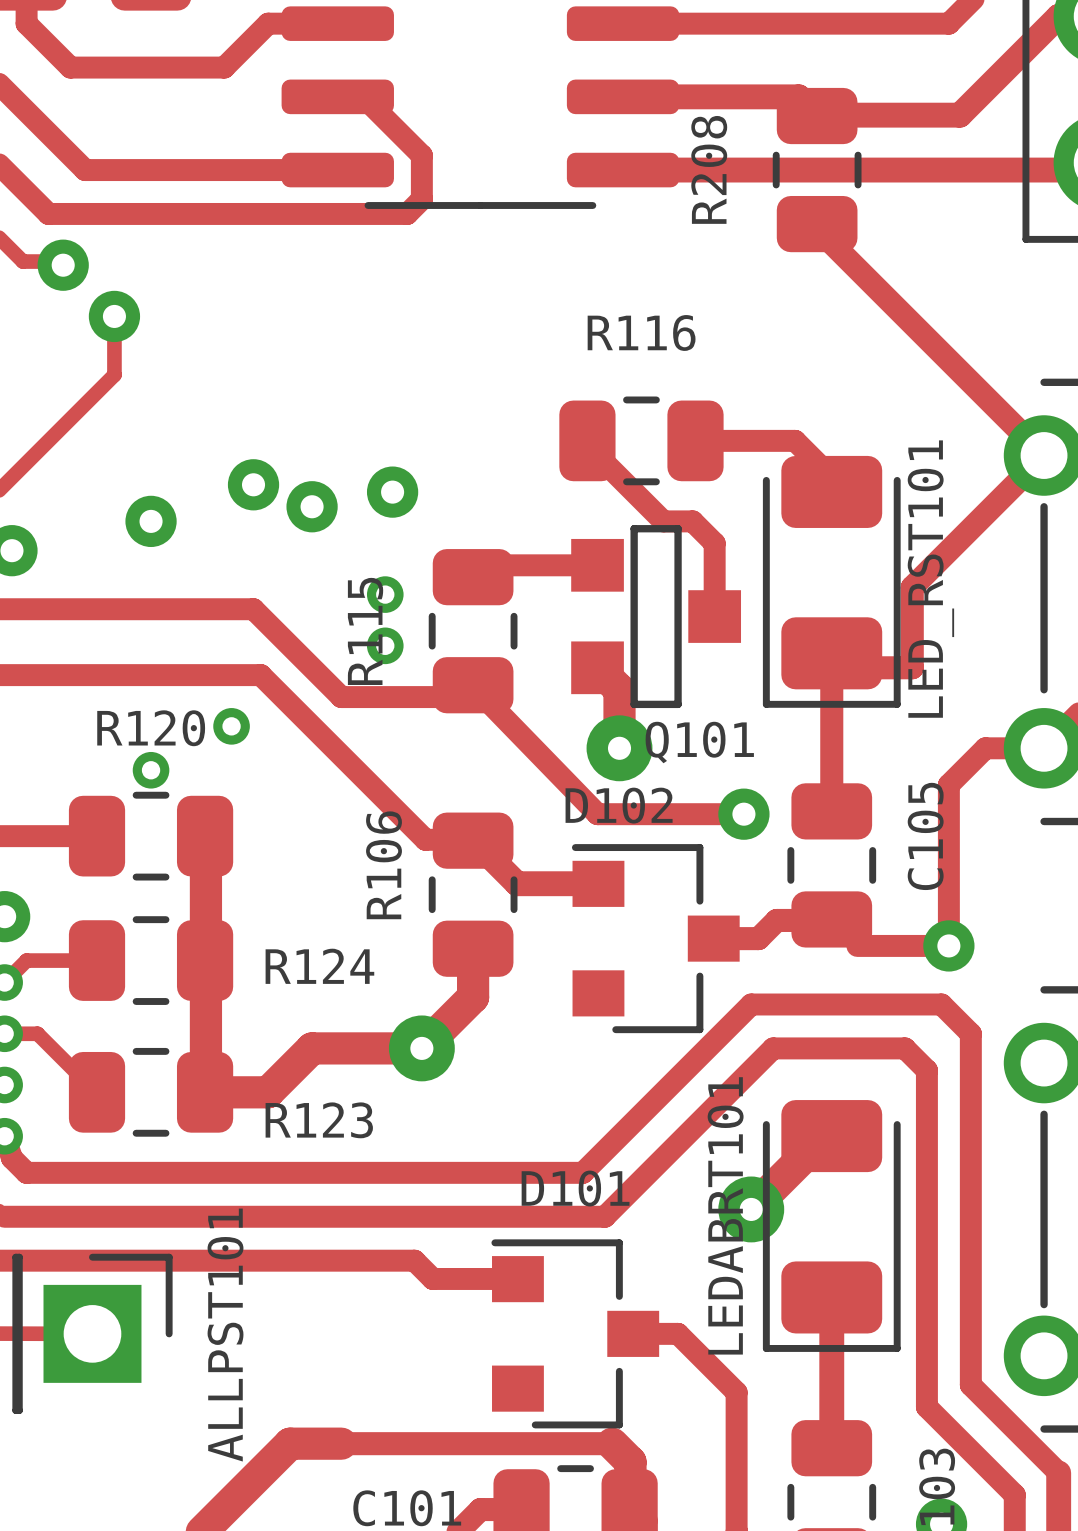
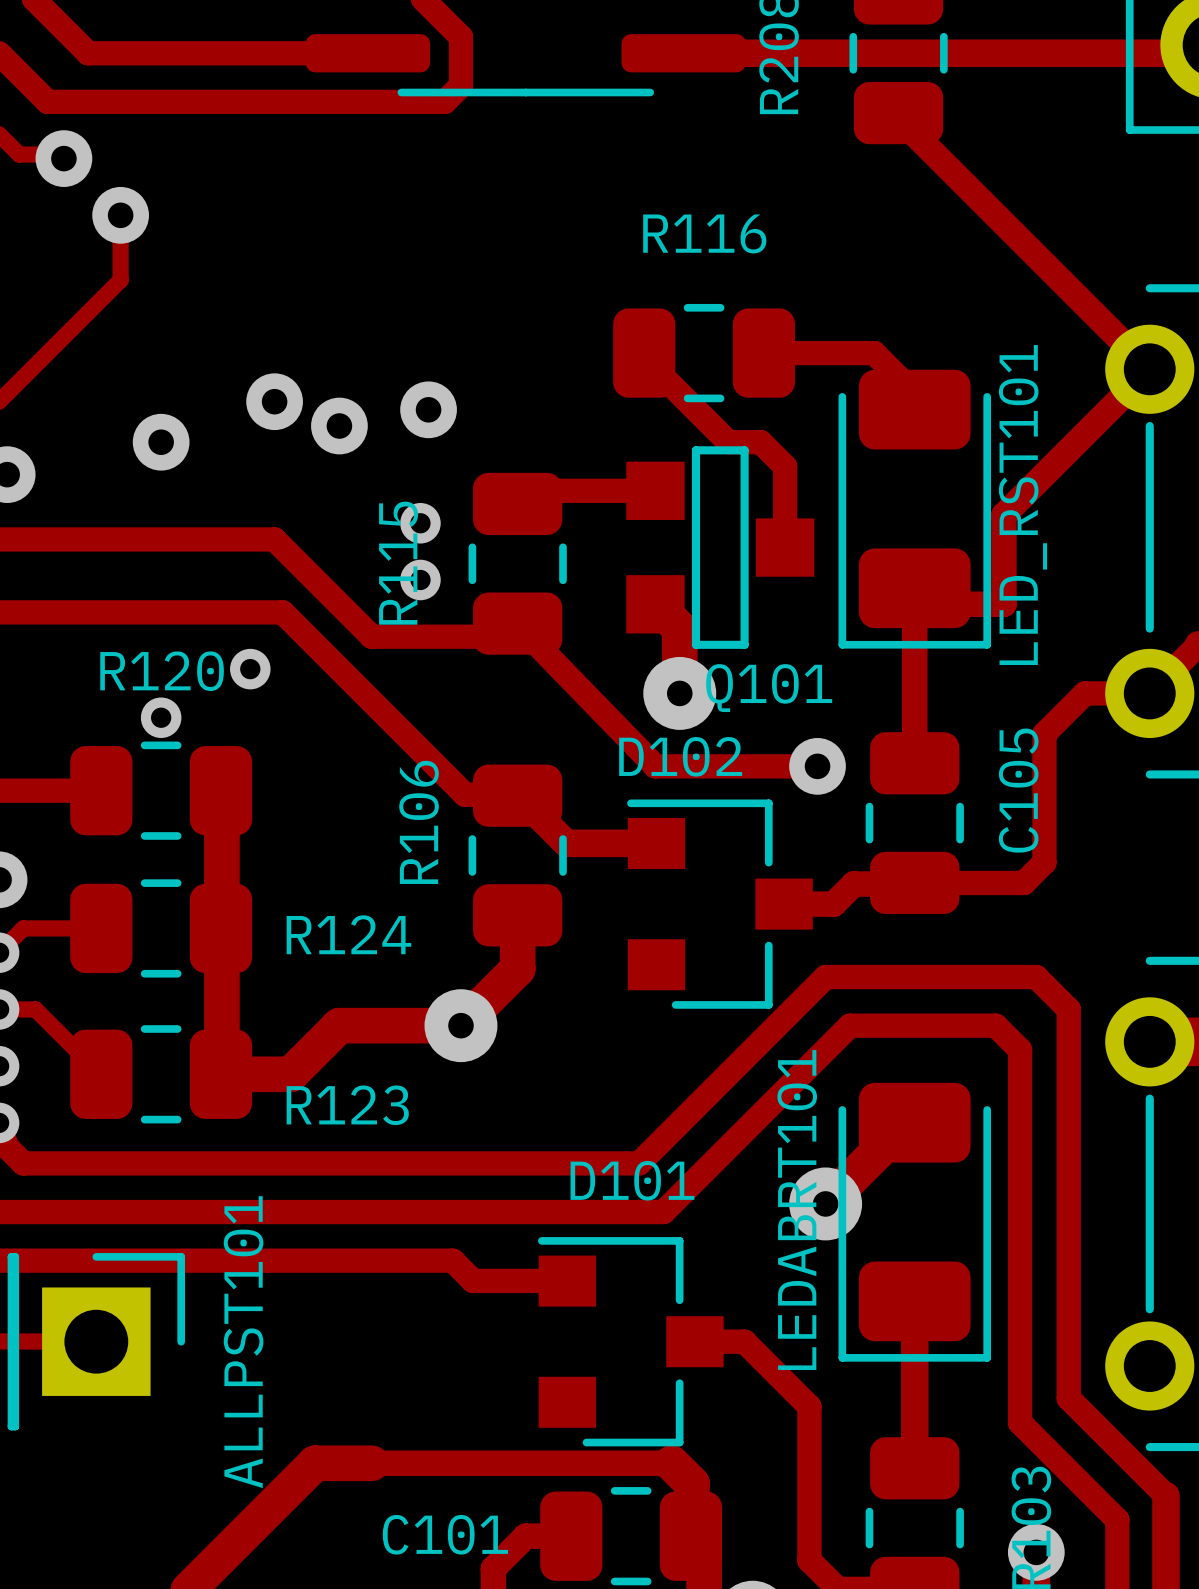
track: (948, 900) (948, 945) (857, 945) (831, 920) -> (1044, 862) (1023, 883) (914, 883)
via: (948, 945) -> none

